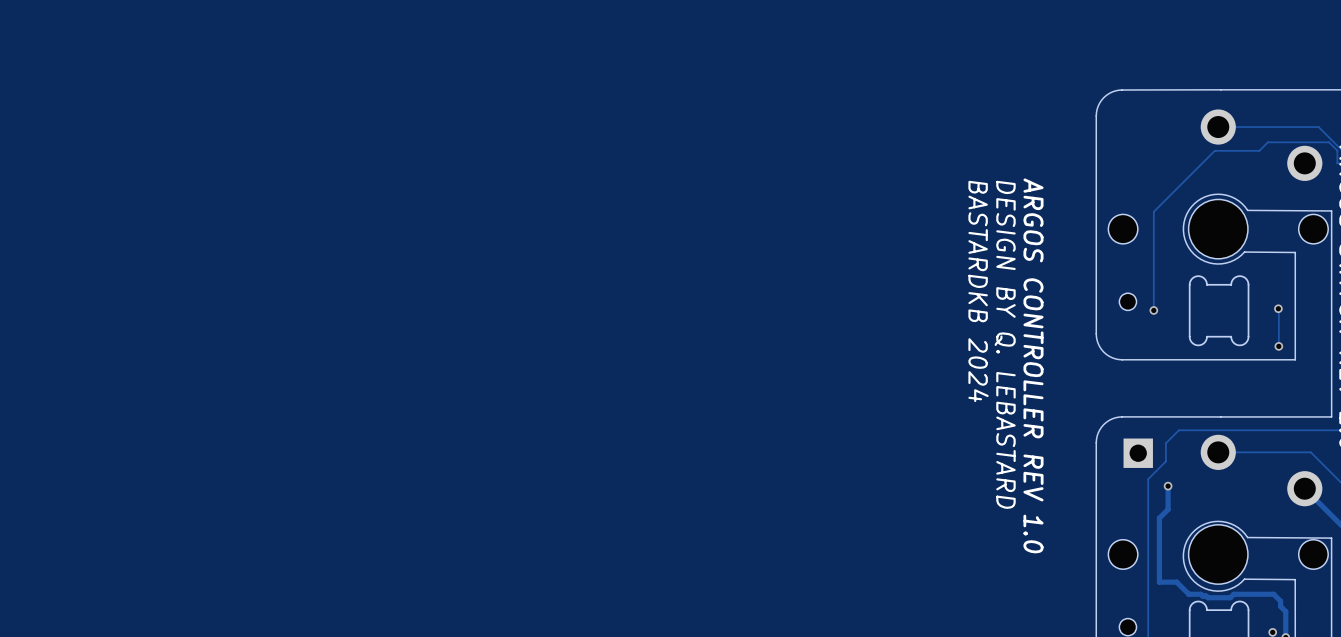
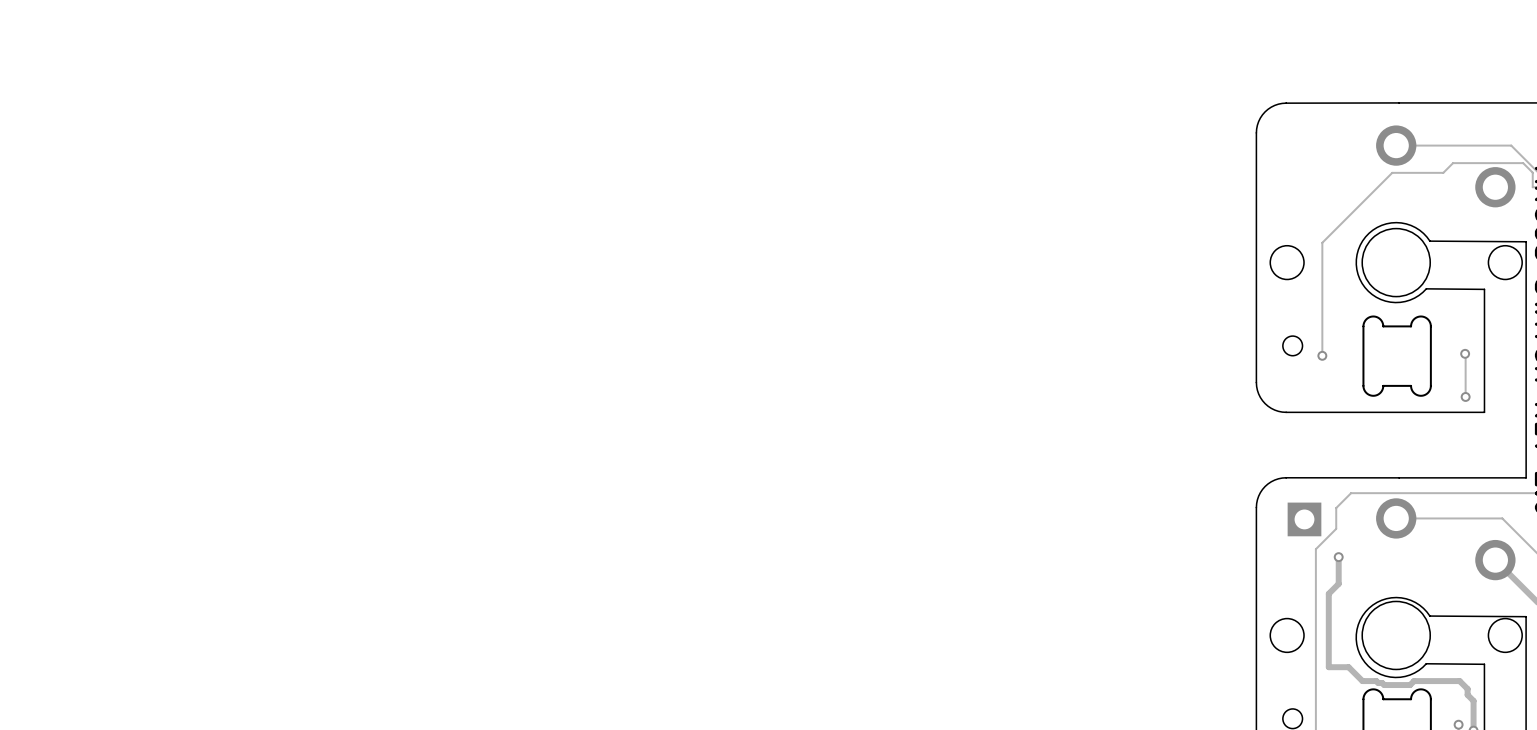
text: BASTARDKB 2024 (978, 291) -> none
text: DESIGN BY Q. LEBASTARD (1005, 344) -> none
text: ARGOS CONTROLLER REV 1.0 (1033, 365) -> none

